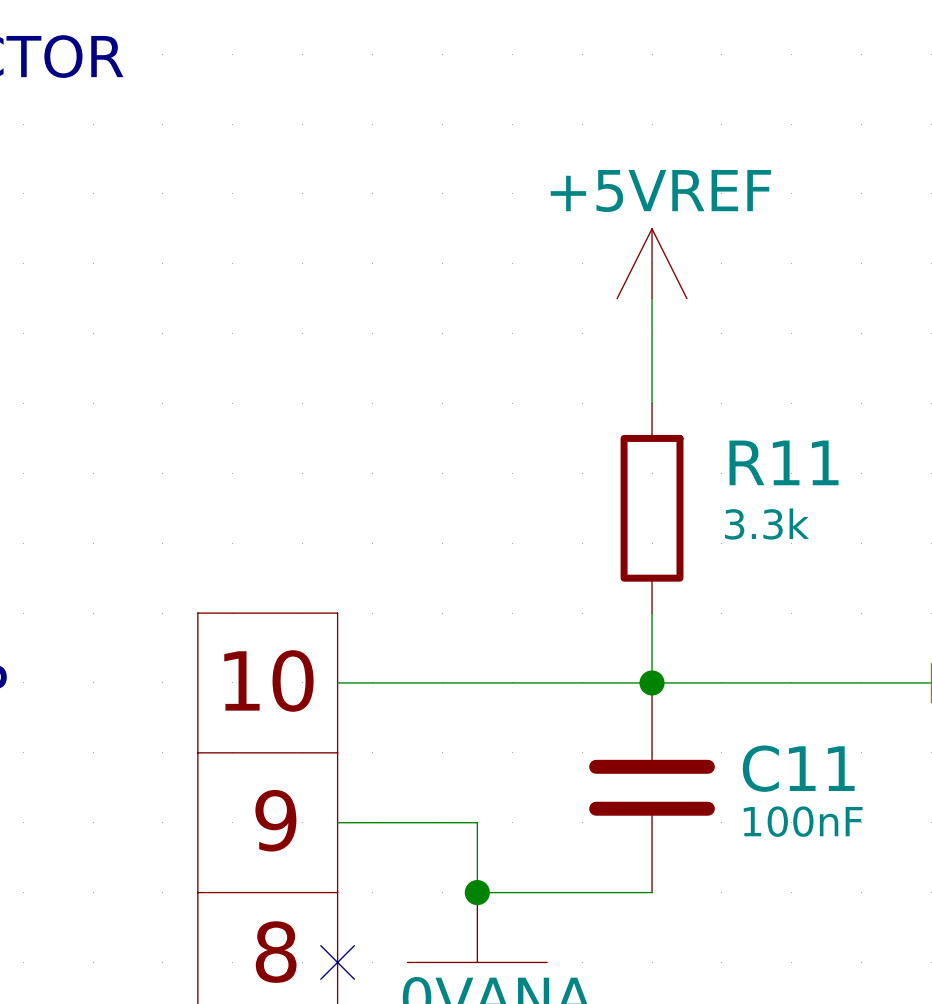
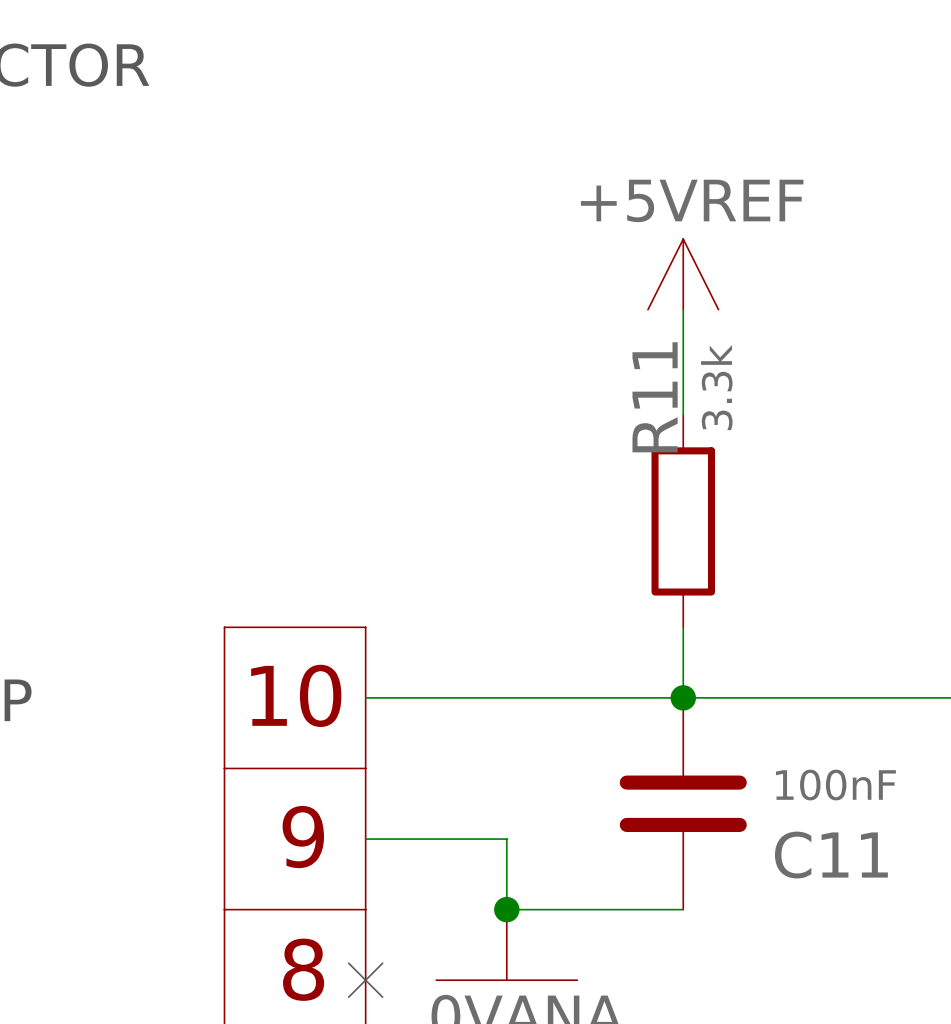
R11 name rotation: 0° (784, 462) -> 90° counterclockwise (655, 397)
R11 value rotation: 0° (767, 524) -> 90° counterclockwise (716, 387)
R11 value position: 3.3k (767, 524) -> 3.3k (716, 387)
C11 name position: C11 (798, 768) -> C11 (831, 855)
C11 value position: 100nF (803, 821) -> 100nF (835, 785)

